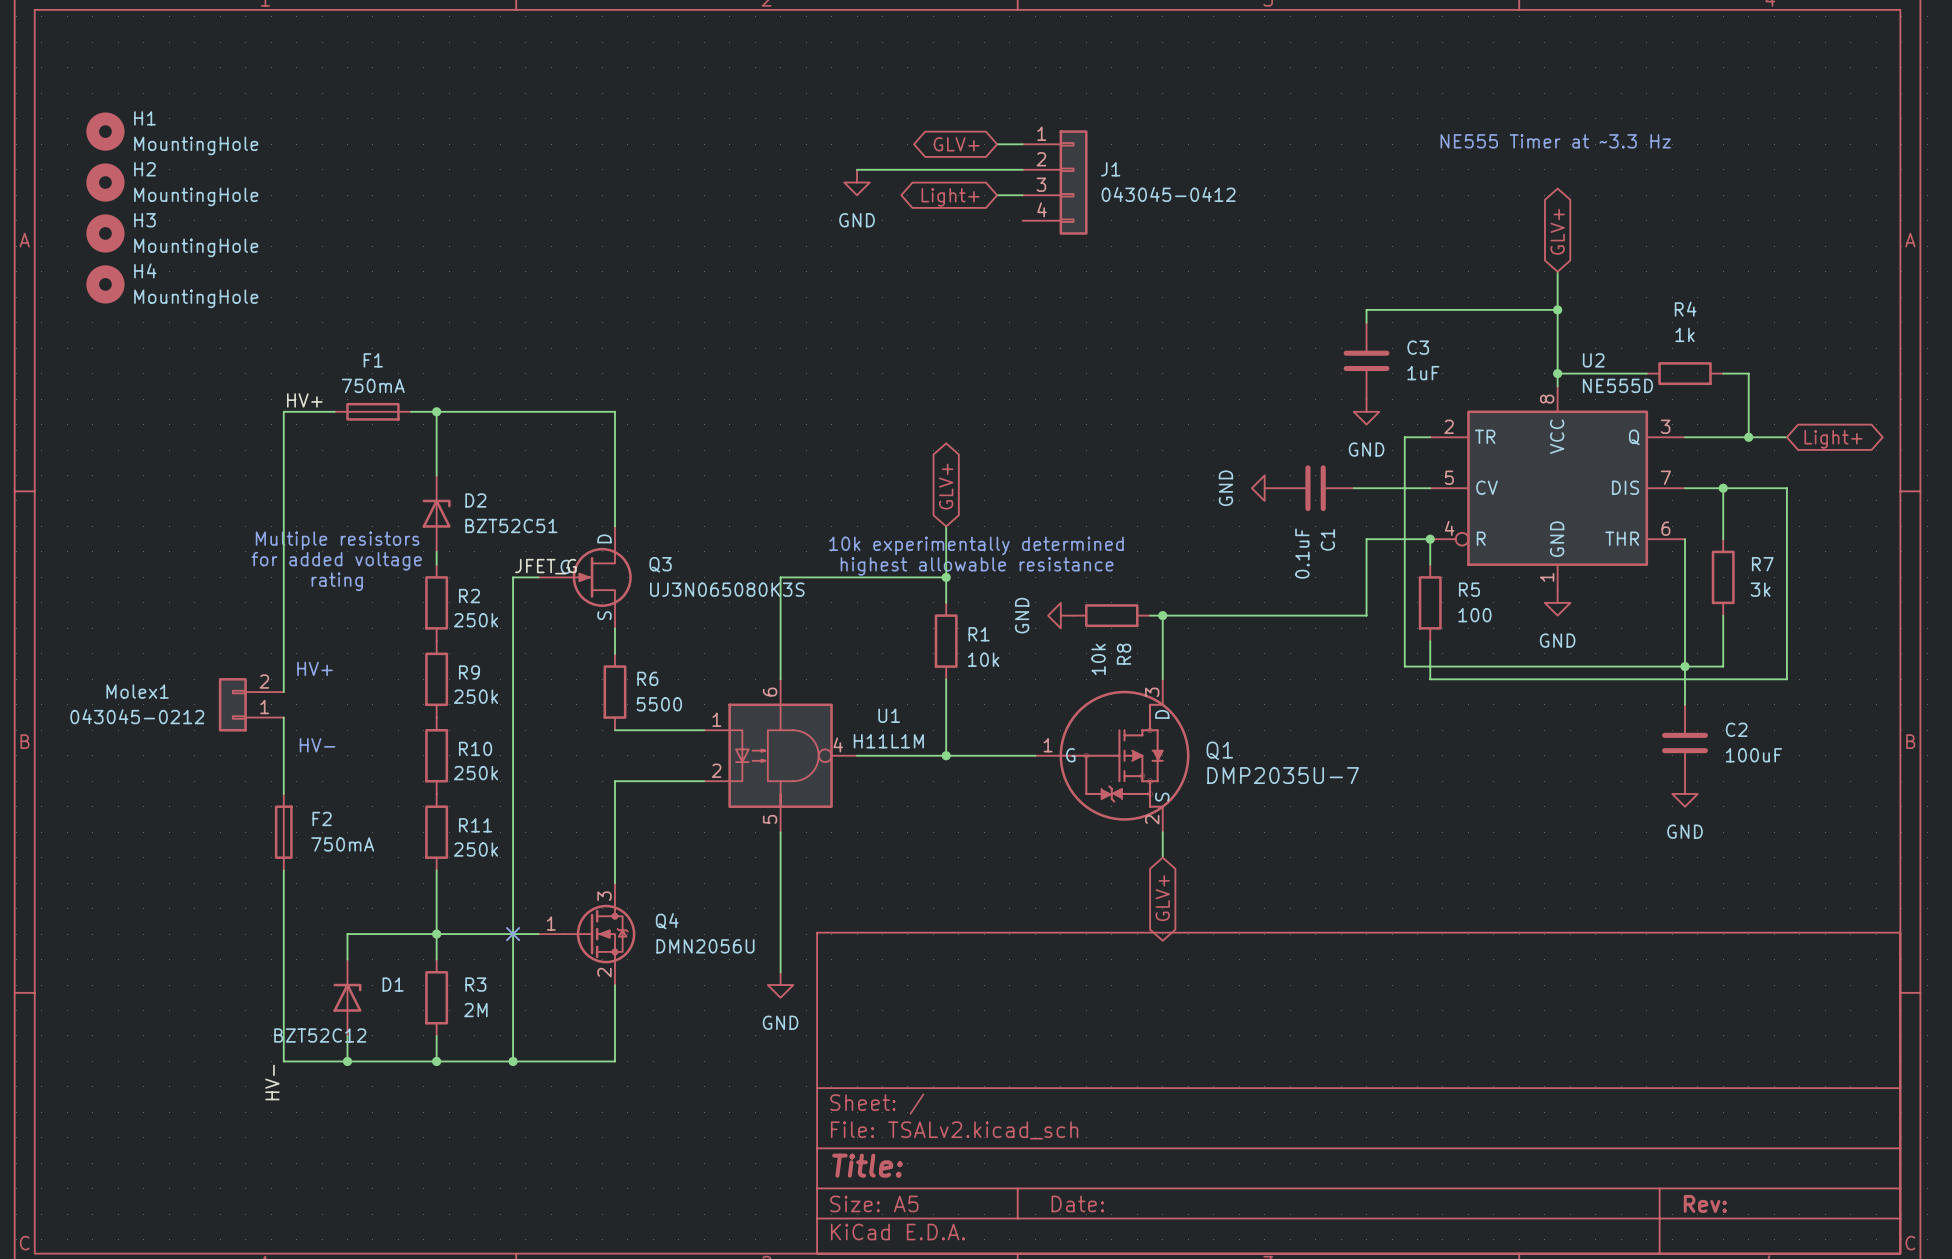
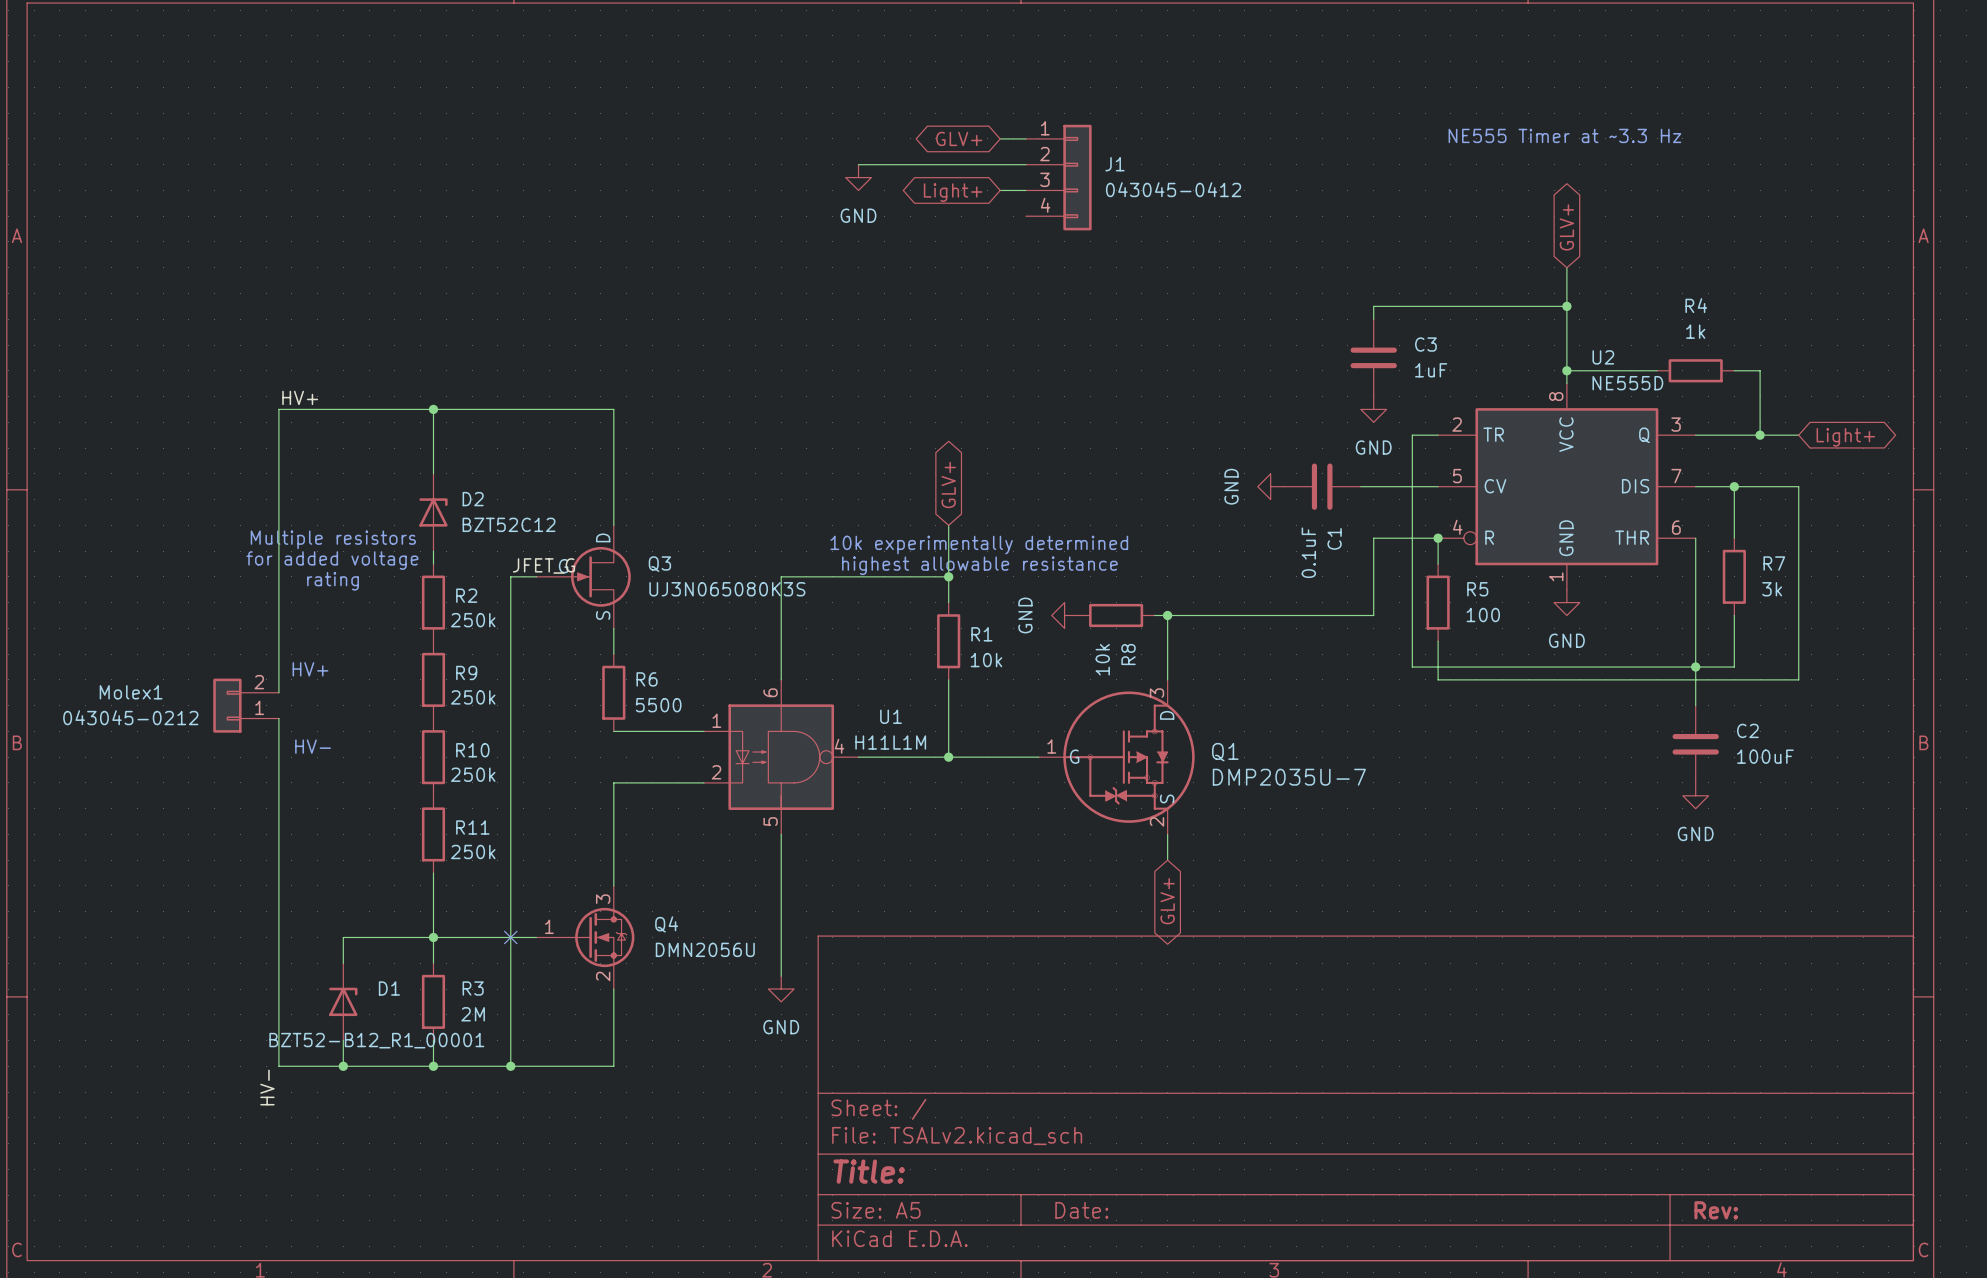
H1: MountingHole (105, 131) -> none
H2: MountingHole (105, 182) -> none
H3: MountingHole (105, 233) -> none
H4: MountingHole (105, 284) -> none
F1: 750mA (372, 411) -> none
D2 value: BZT52C51 (511, 525) -> BZT52C12 (509, 524)
F2: 750mA (283, 832) -> none
D1 value: BZT52C12 (320, 1035) -> BZT52-B12_R1_00001 (376, 1040)

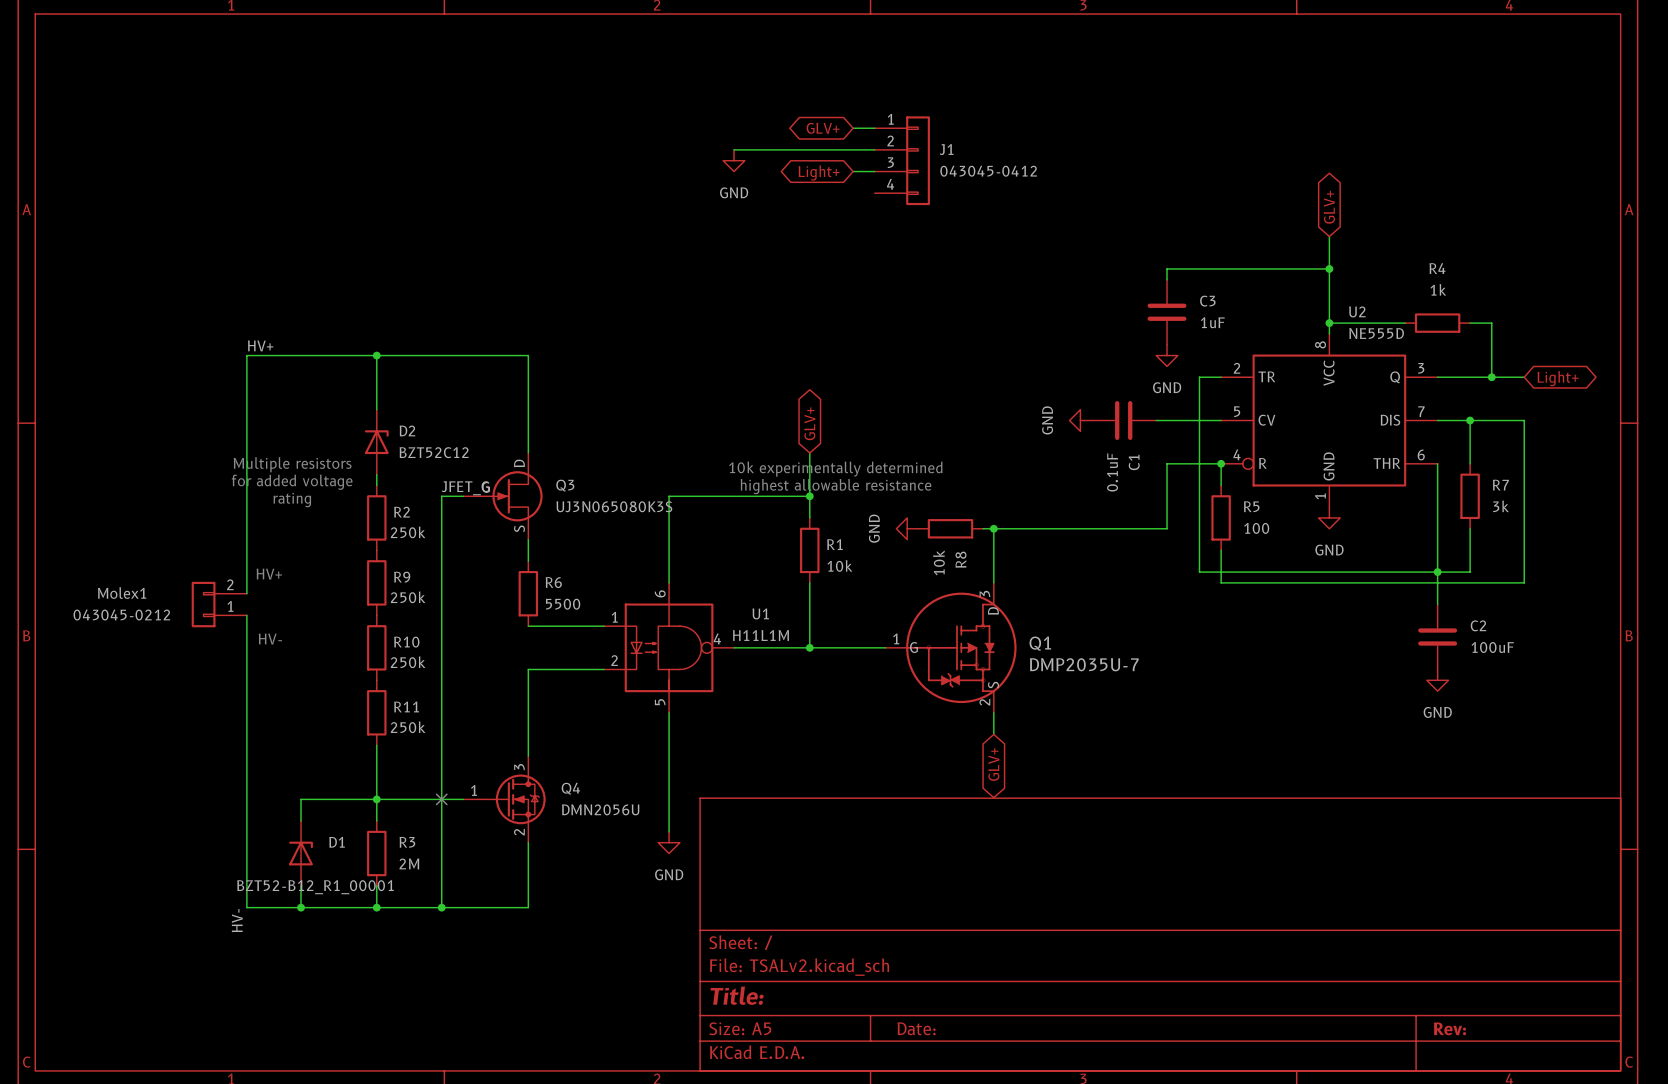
text: NE555 Timer at ~3.3 Hz (1564, 135) -> none

